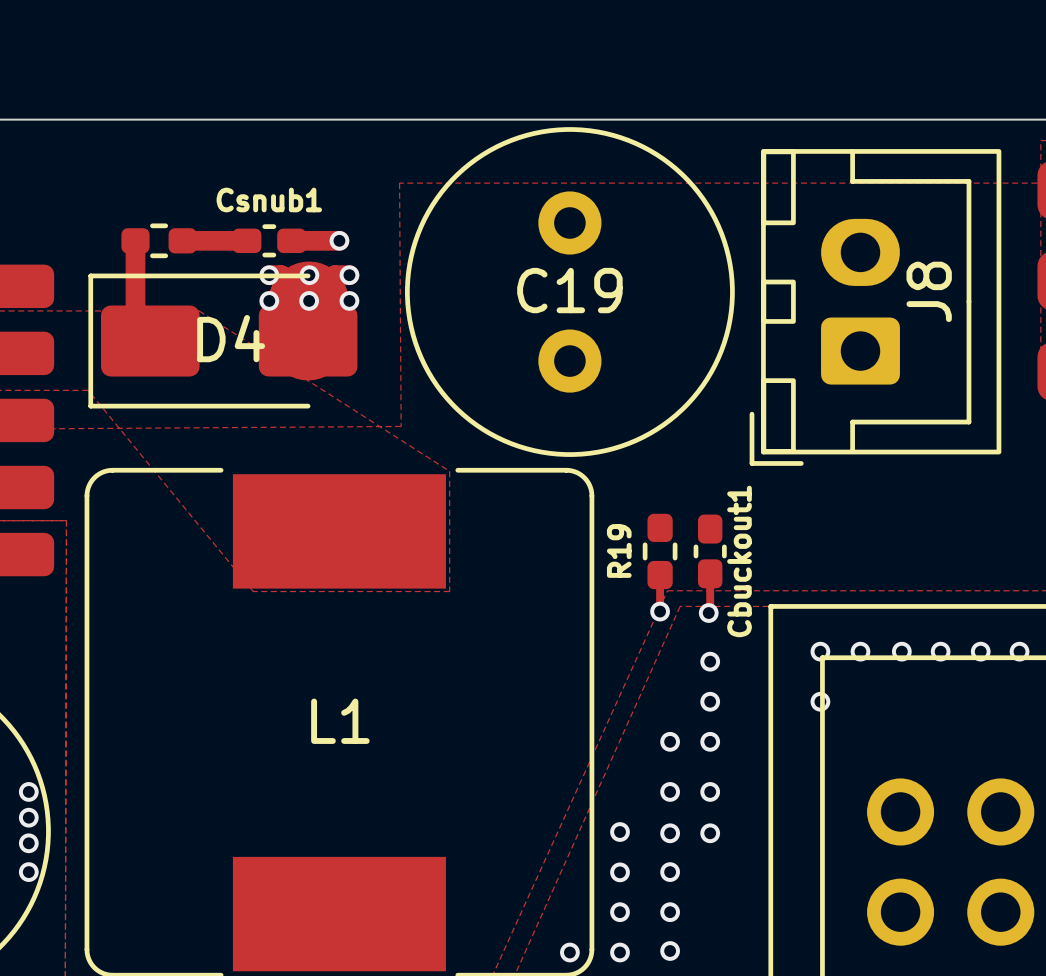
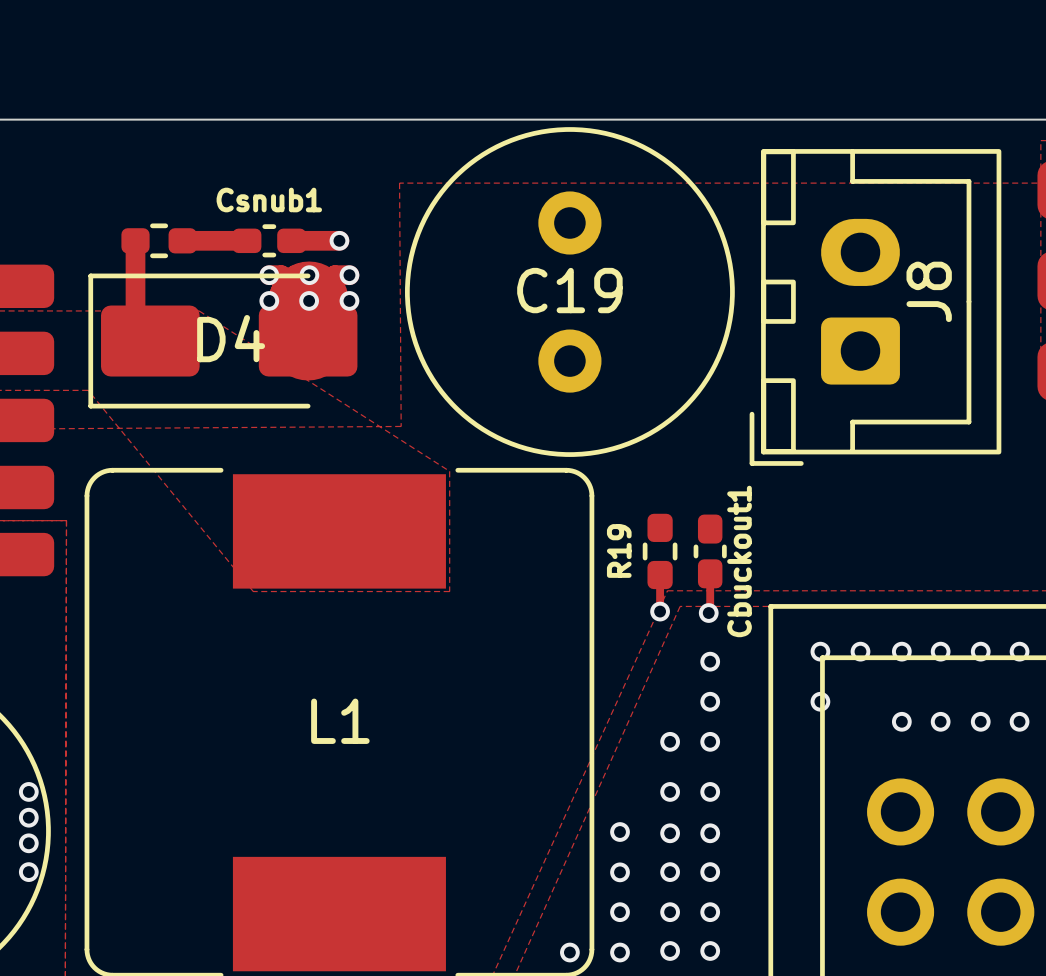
via: none -> (901, 721)
via: none -> (940, 721)
via: none -> (980, 721)
via: none -> (1019, 721)
via: none -> (710, 872)
via: none -> (710, 912)
via: none -> (710, 950)

